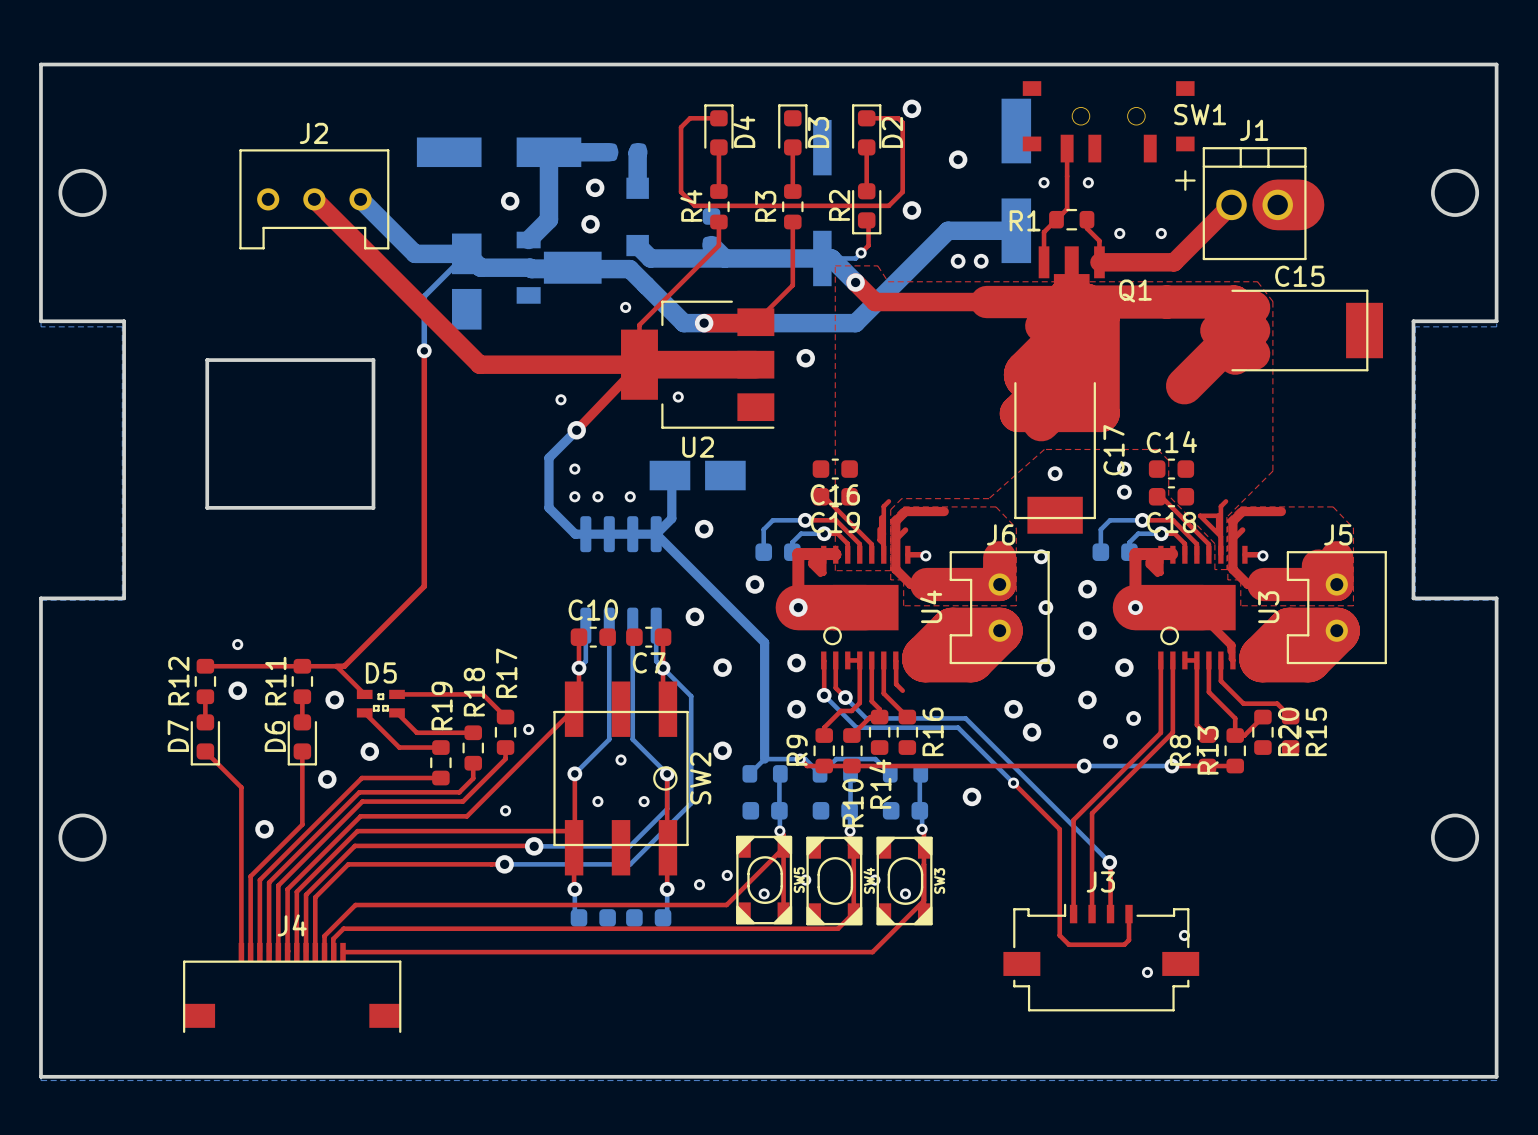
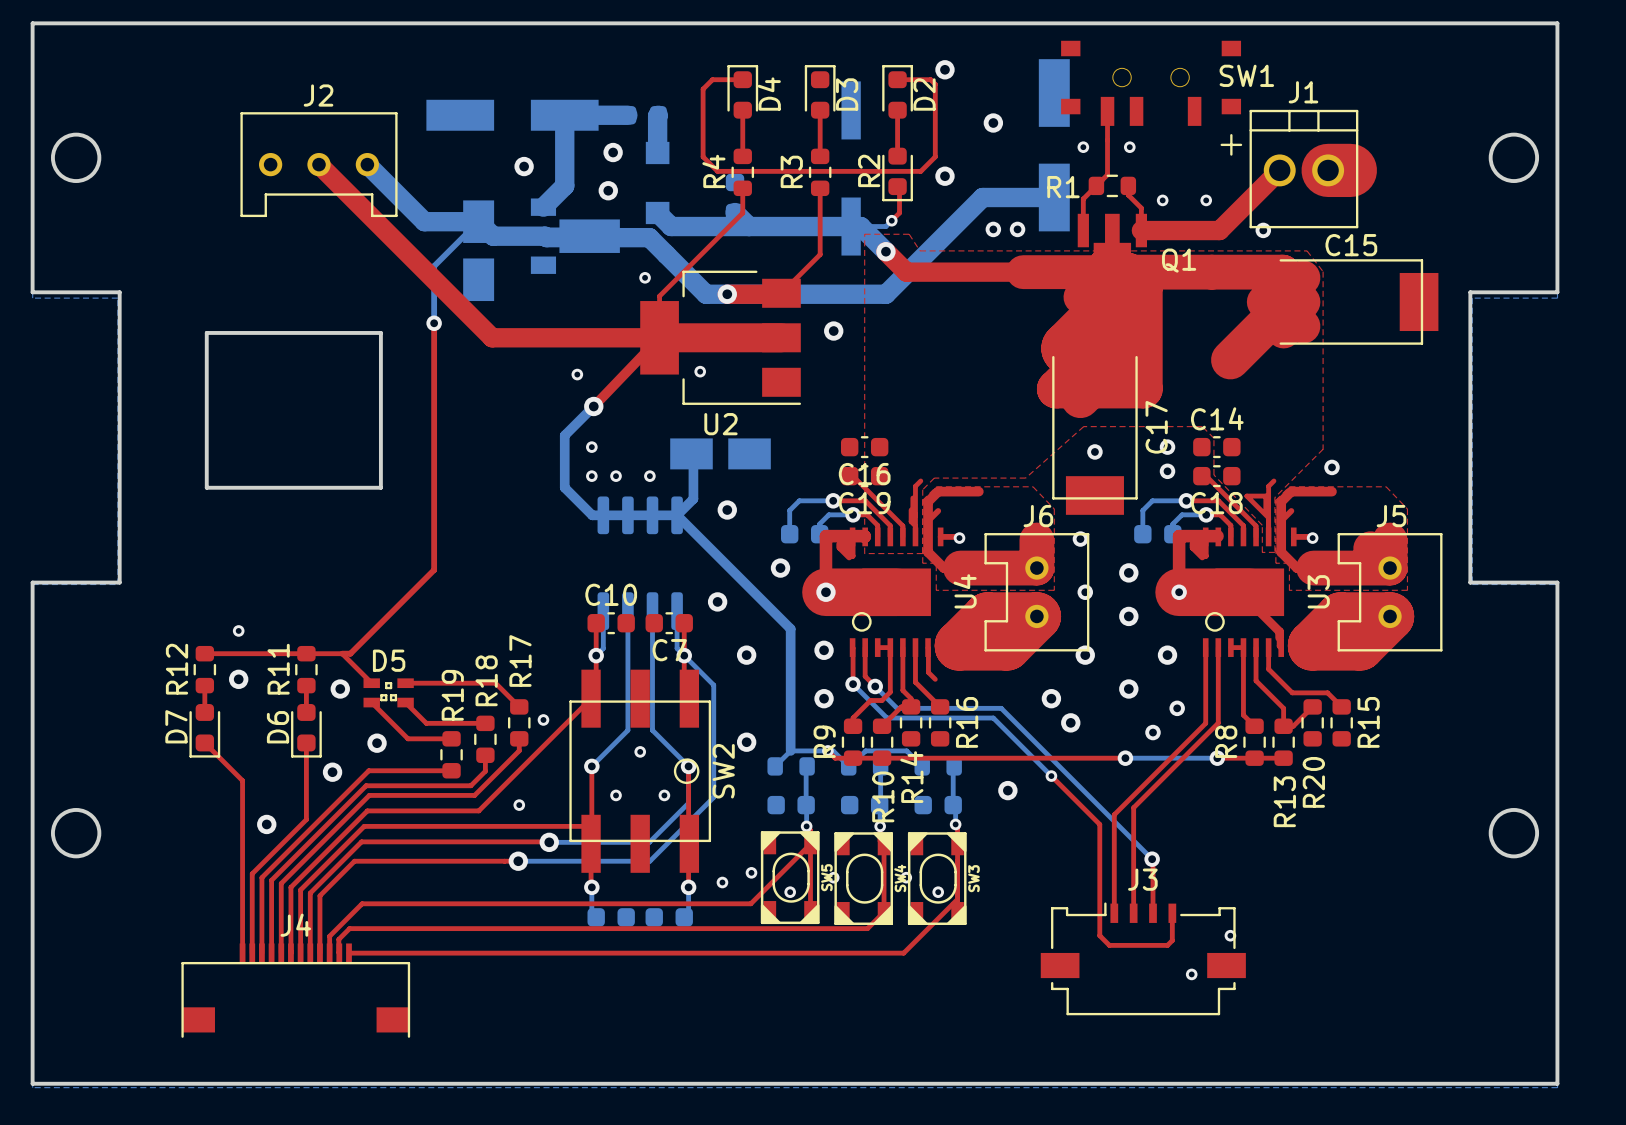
via: none -> (1263, 230)
via: none -> (1331, 467)
R20 name position: R20 (1288, 731) -> R20 (1313, 782)
R13 name position: R13 (1208, 750) -> R13 (1284, 801)

